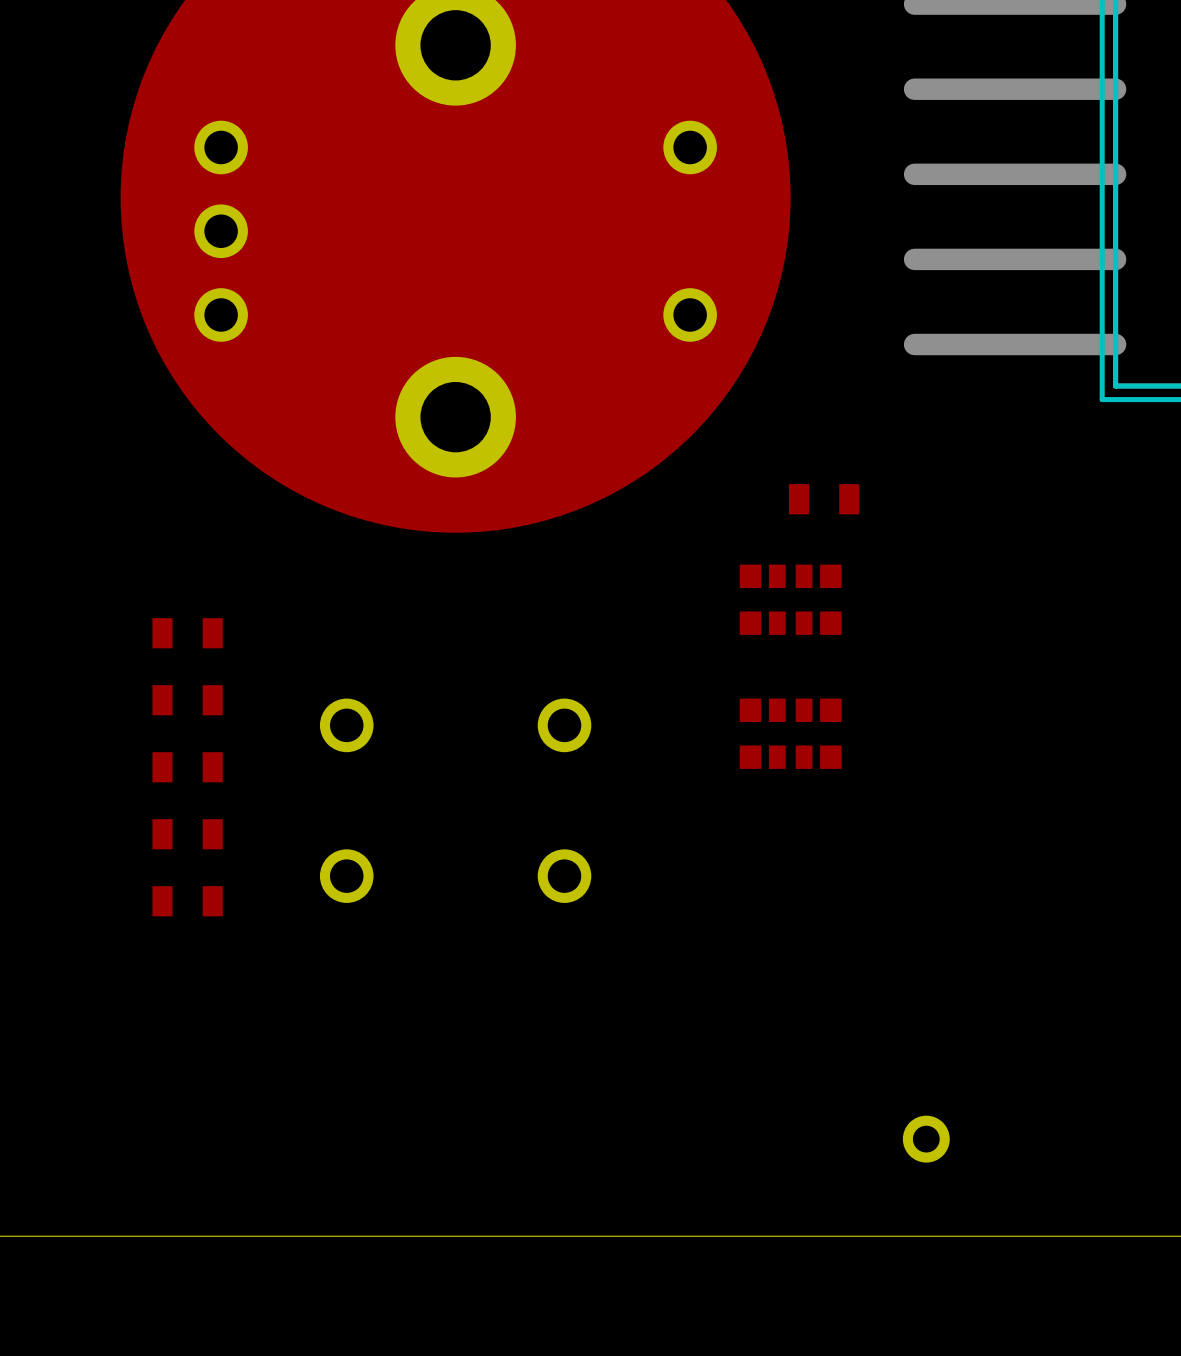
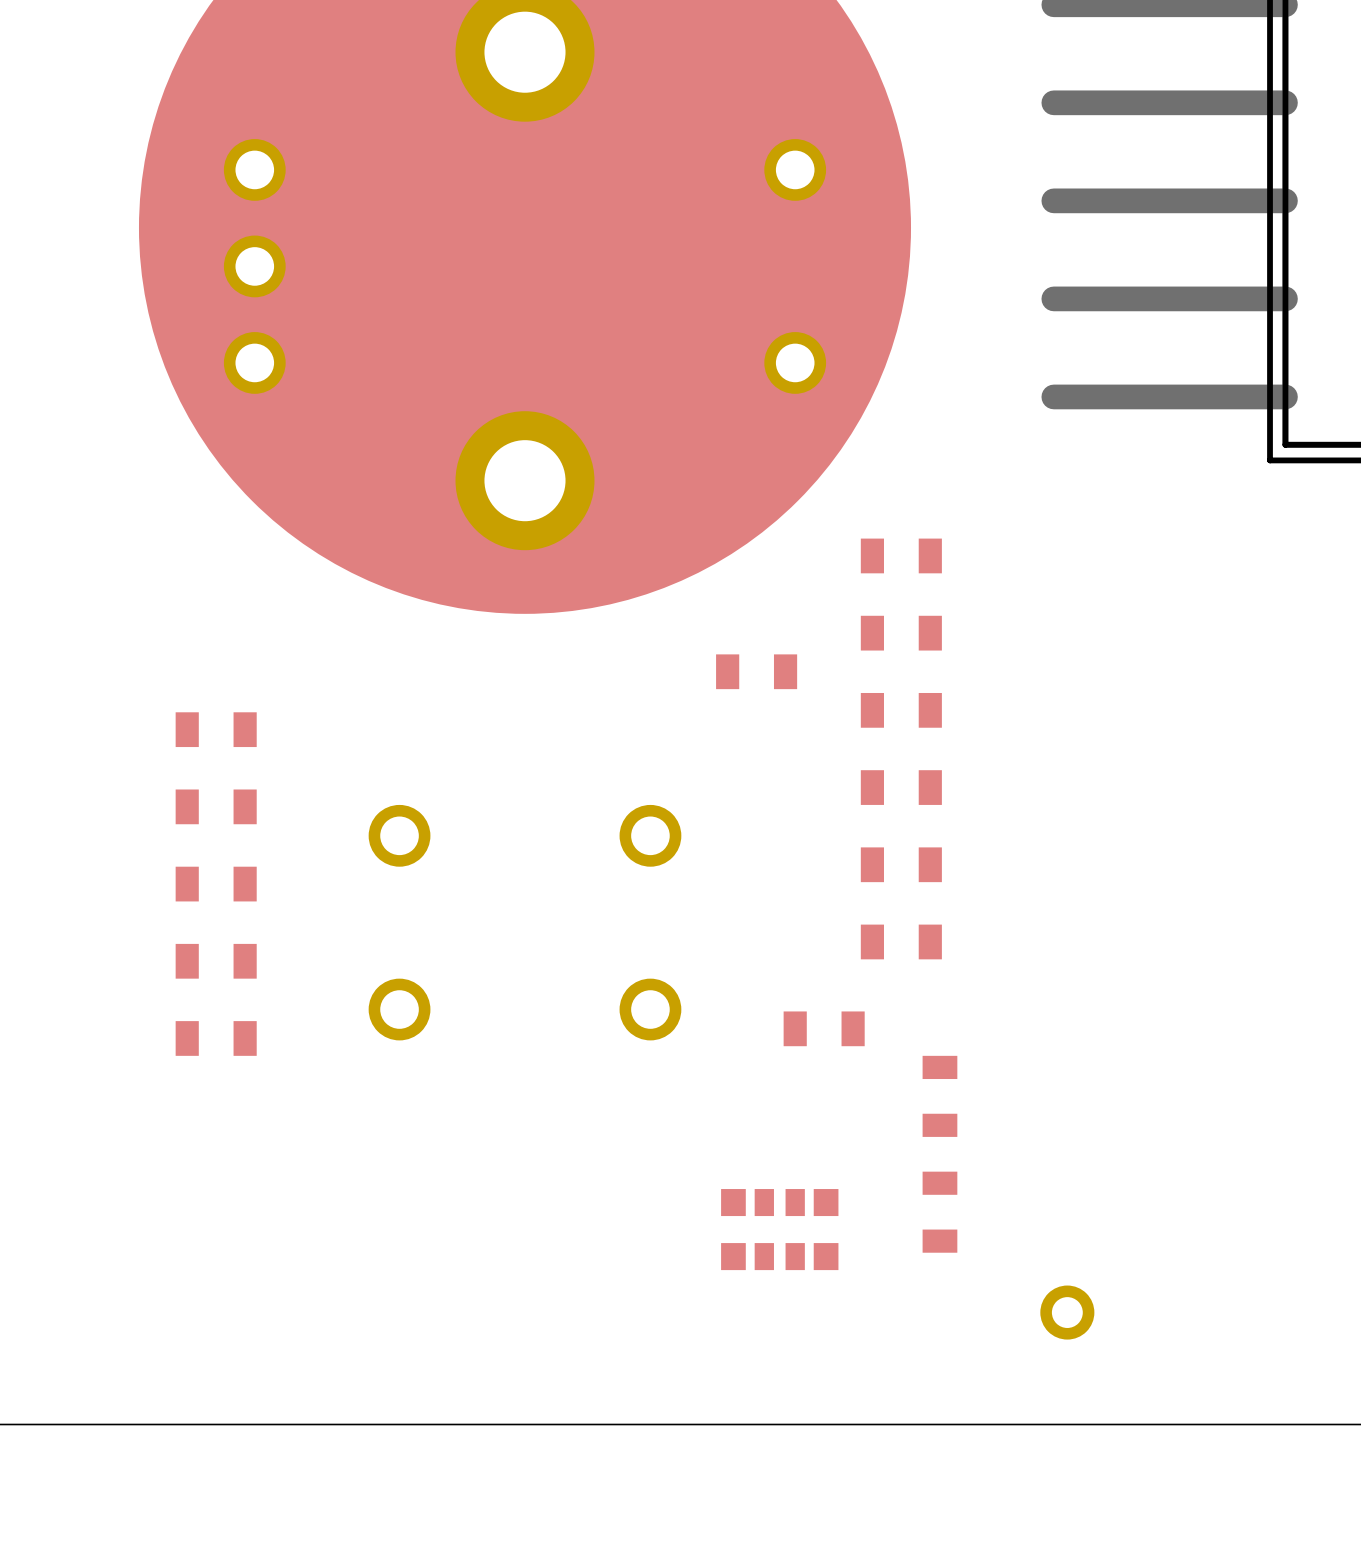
part: none -> (901, 555)
part: (824, 499) -> none
part: none -> (901, 633)
part footprint: [739, 564, 842, 635] -> [860, 692, 942, 728]
part: none -> (756, 671)
part: none -> (901, 787)
part footprint: [739, 698, 842, 769] -> [860, 847, 942, 883]
part: none -> (901, 941)
part: none -> (824, 1028)
part: none -> (939, 1096)
part: none -> (939, 1212)
part: none -> (779, 1229)

